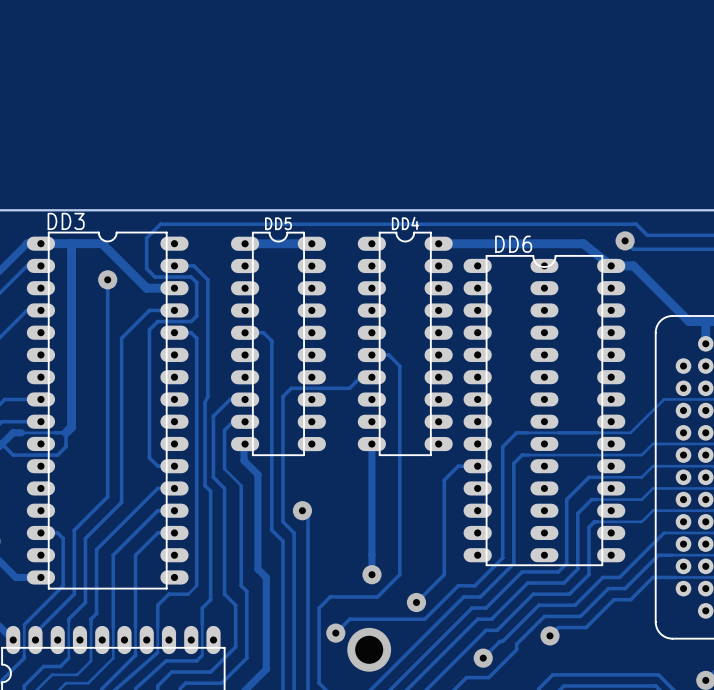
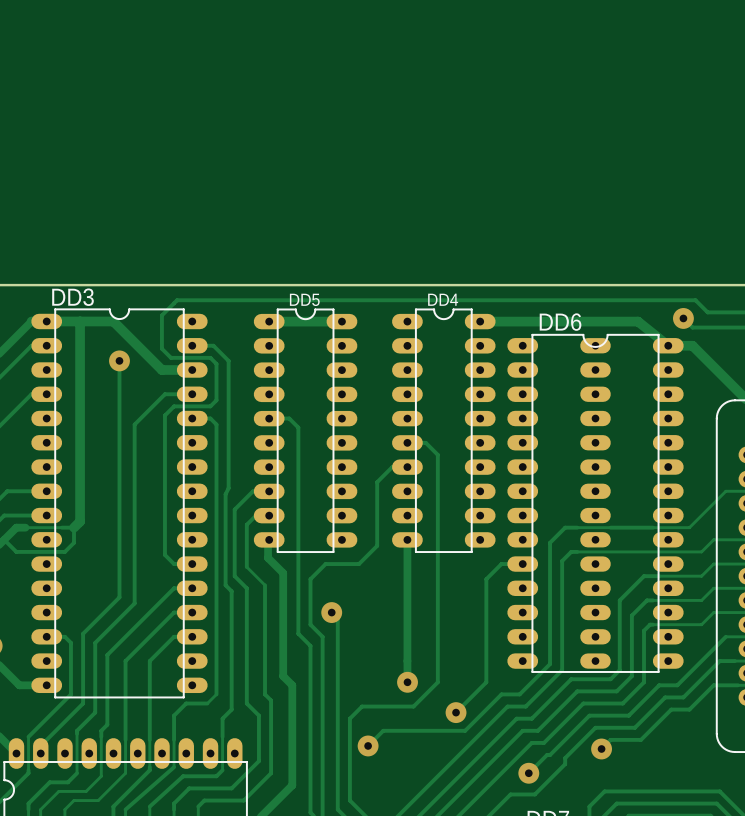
track: (360, 377) (349, 388) (291, 388) (282, 396) (282, 480) -> (395, 467) (392, 467) (377, 482) (377, 545) (359, 564) (325, 564) (310, 579)
via: (369, 649) -> none

